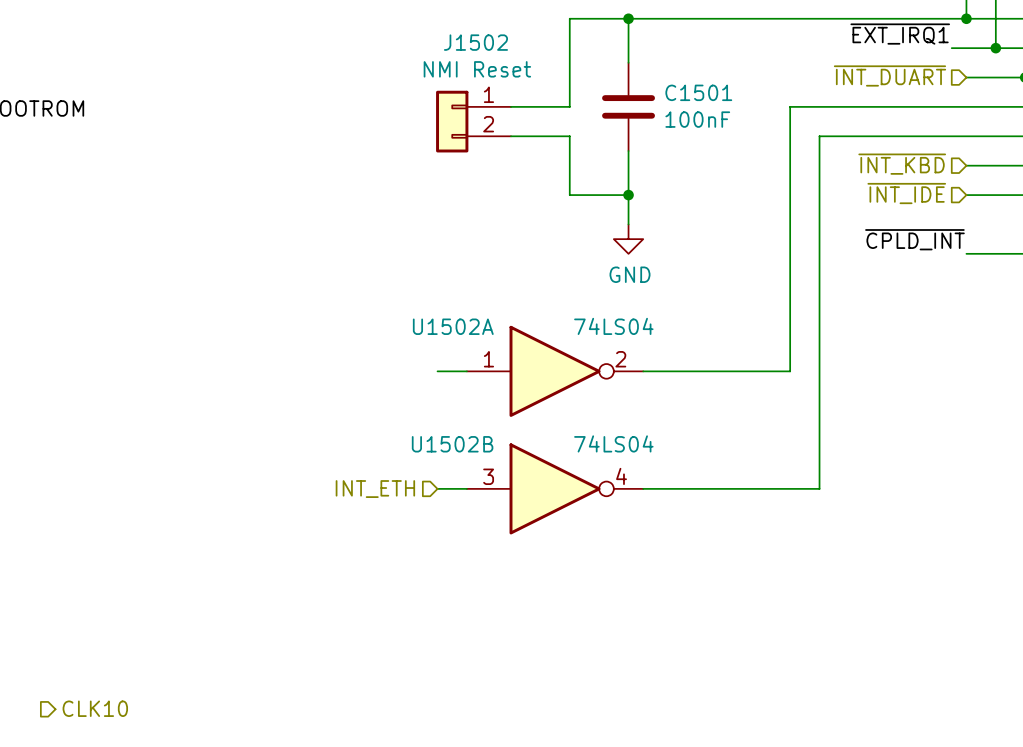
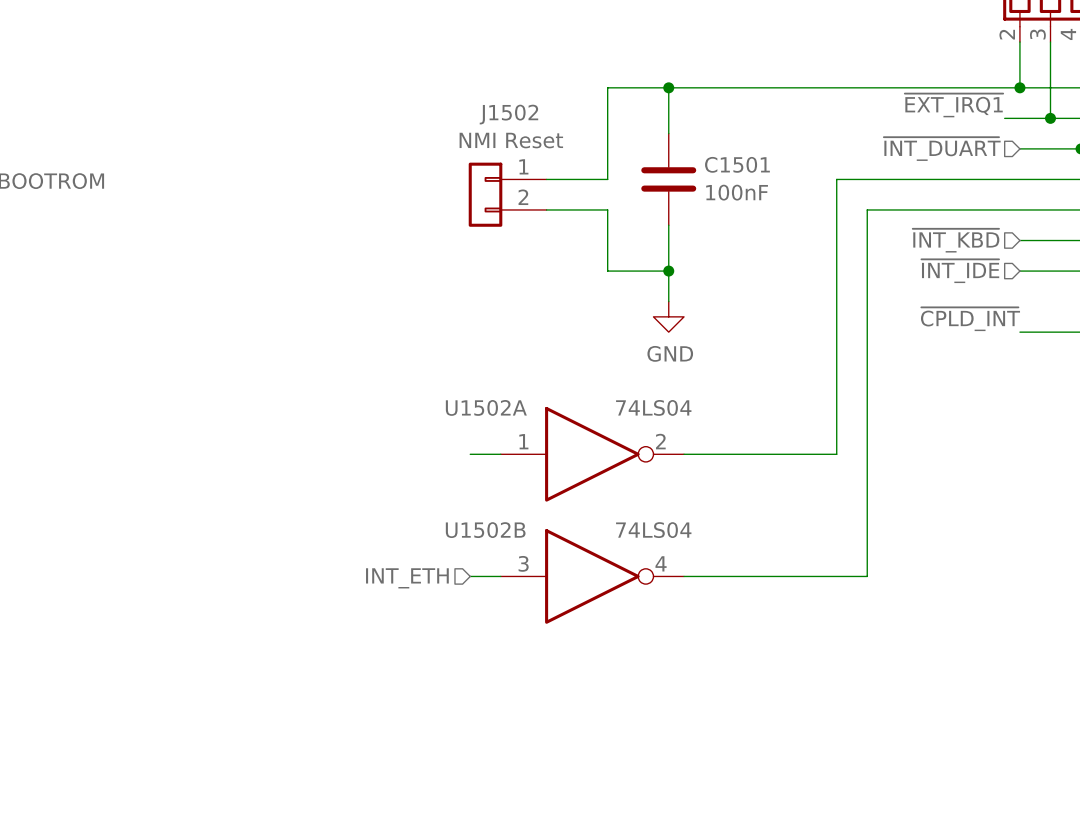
hierarchical label: CLK10 (95, 708) -> none

